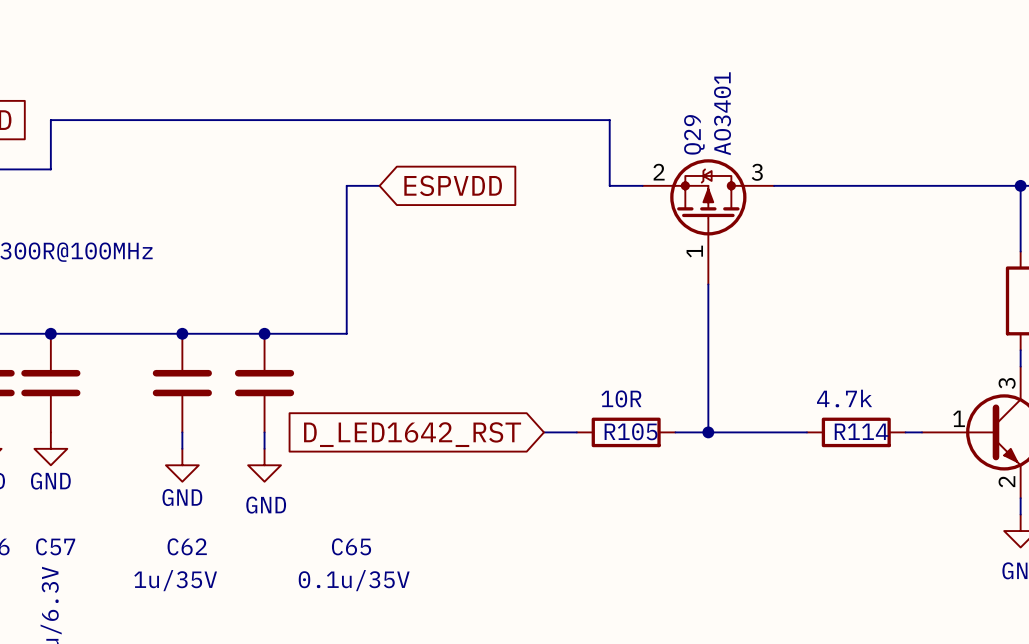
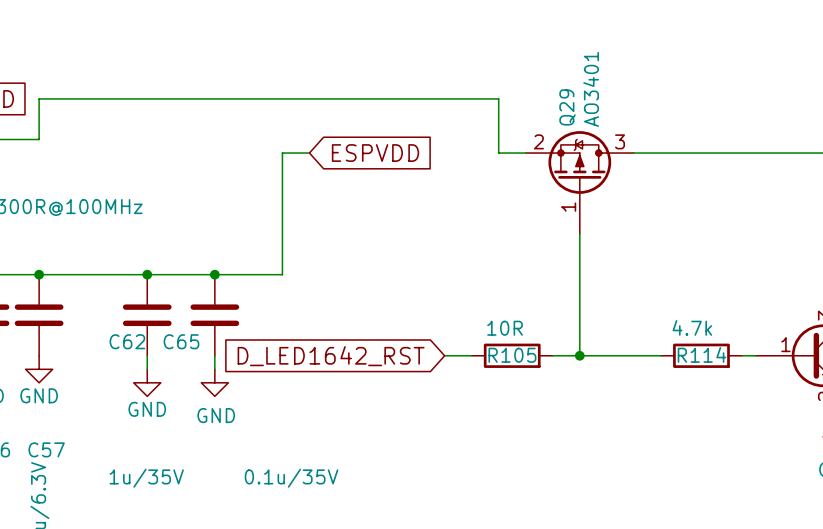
C62 name position: C62 (187, 546) -> C62 (127, 341)
C65 name position: C65 (351, 546) -> C65 (181, 341)

